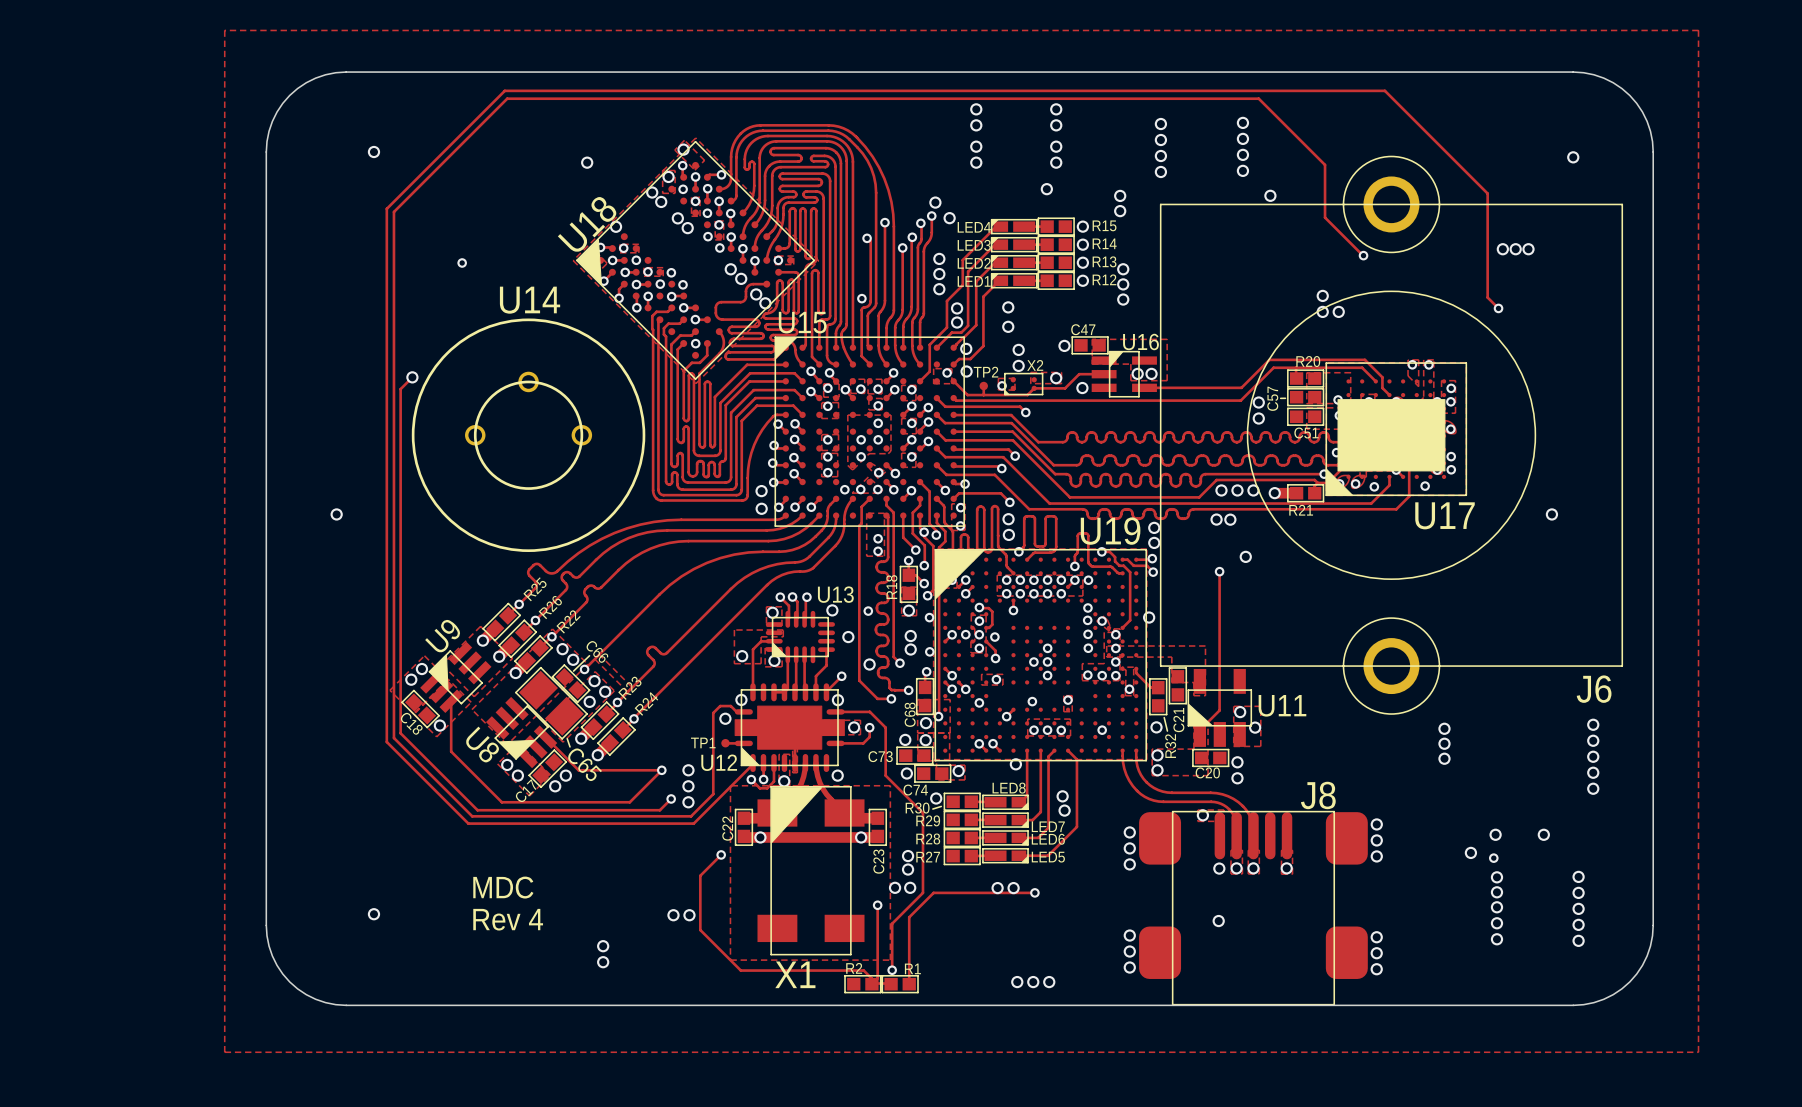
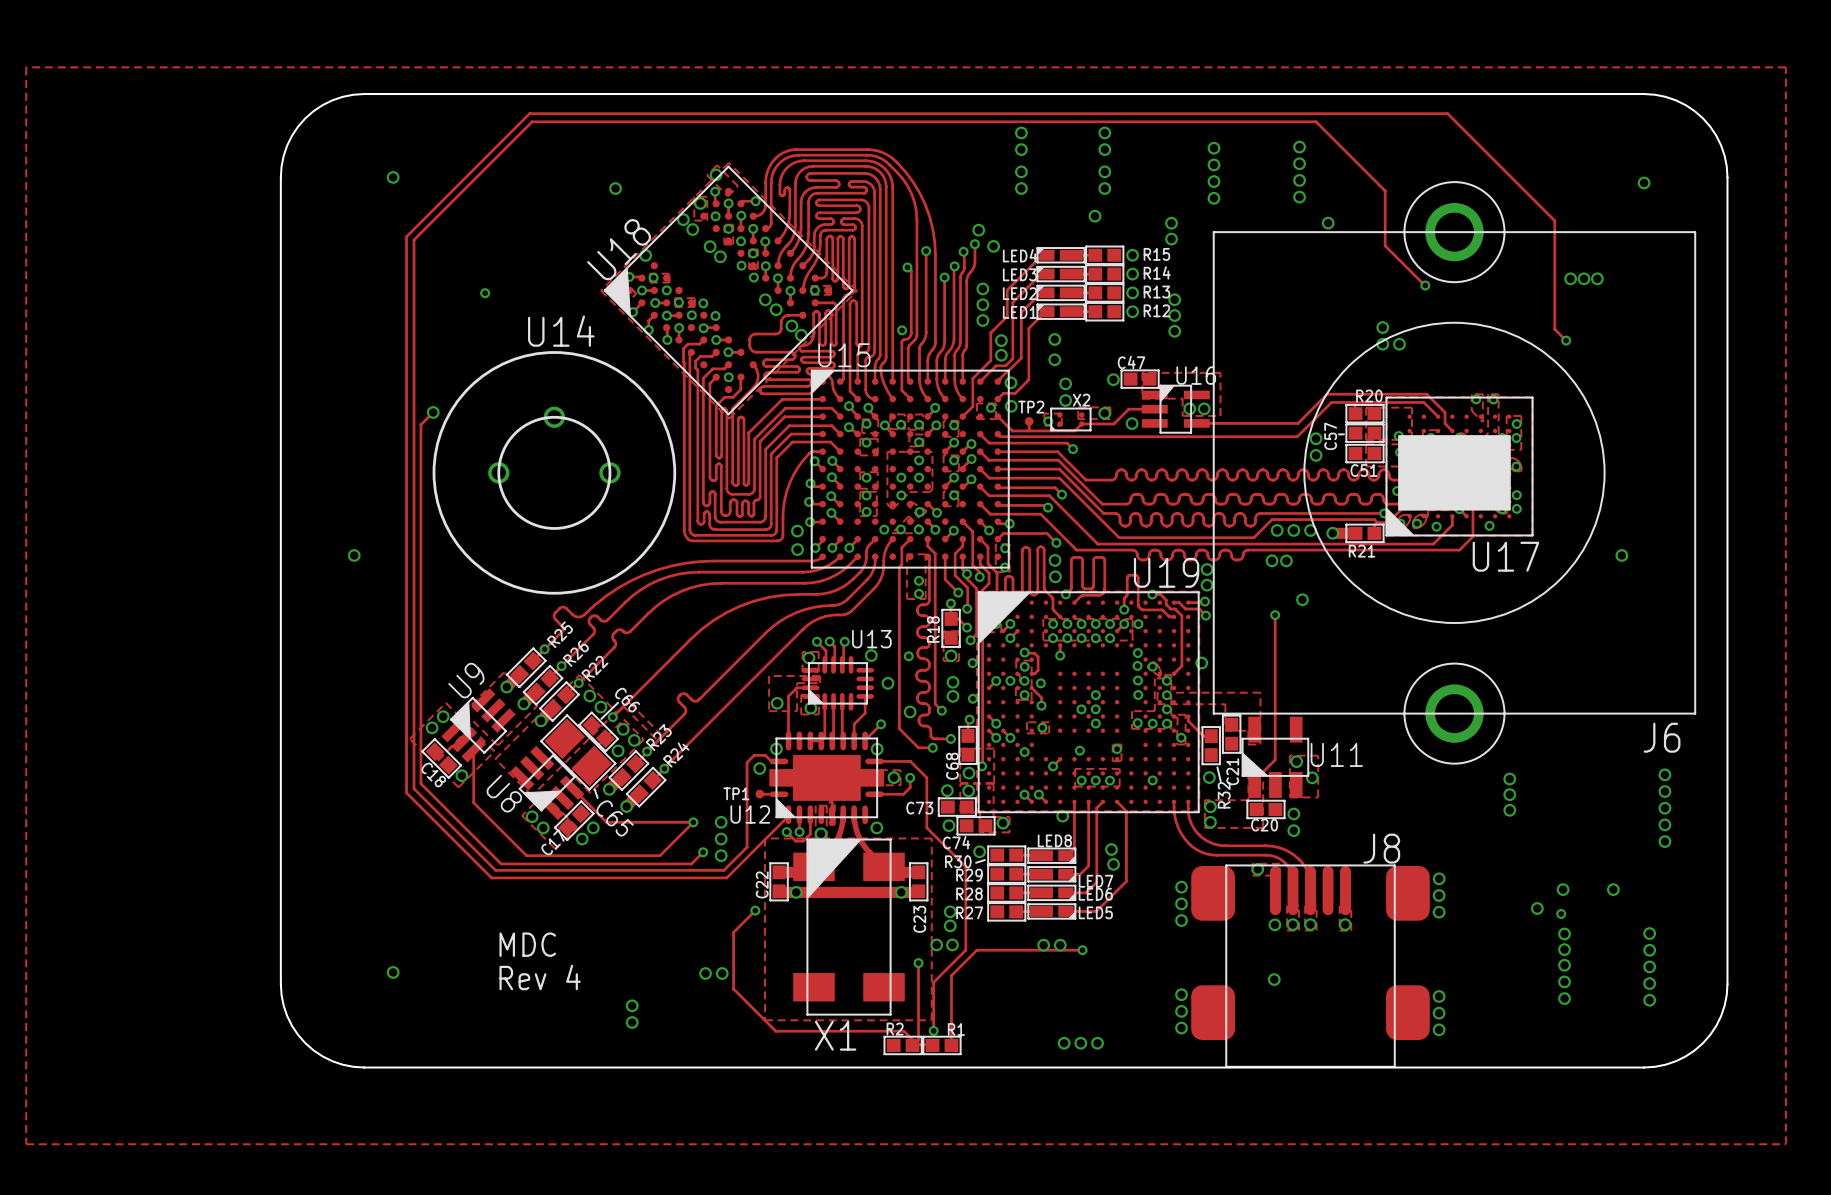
zone outline: (224, 30) (224, 1052) (1698, 1052) (1698, 30) (224, 30) -> (26, 67) (26, 1144) (1785, 1144) (1785, 67) (26, 67)

